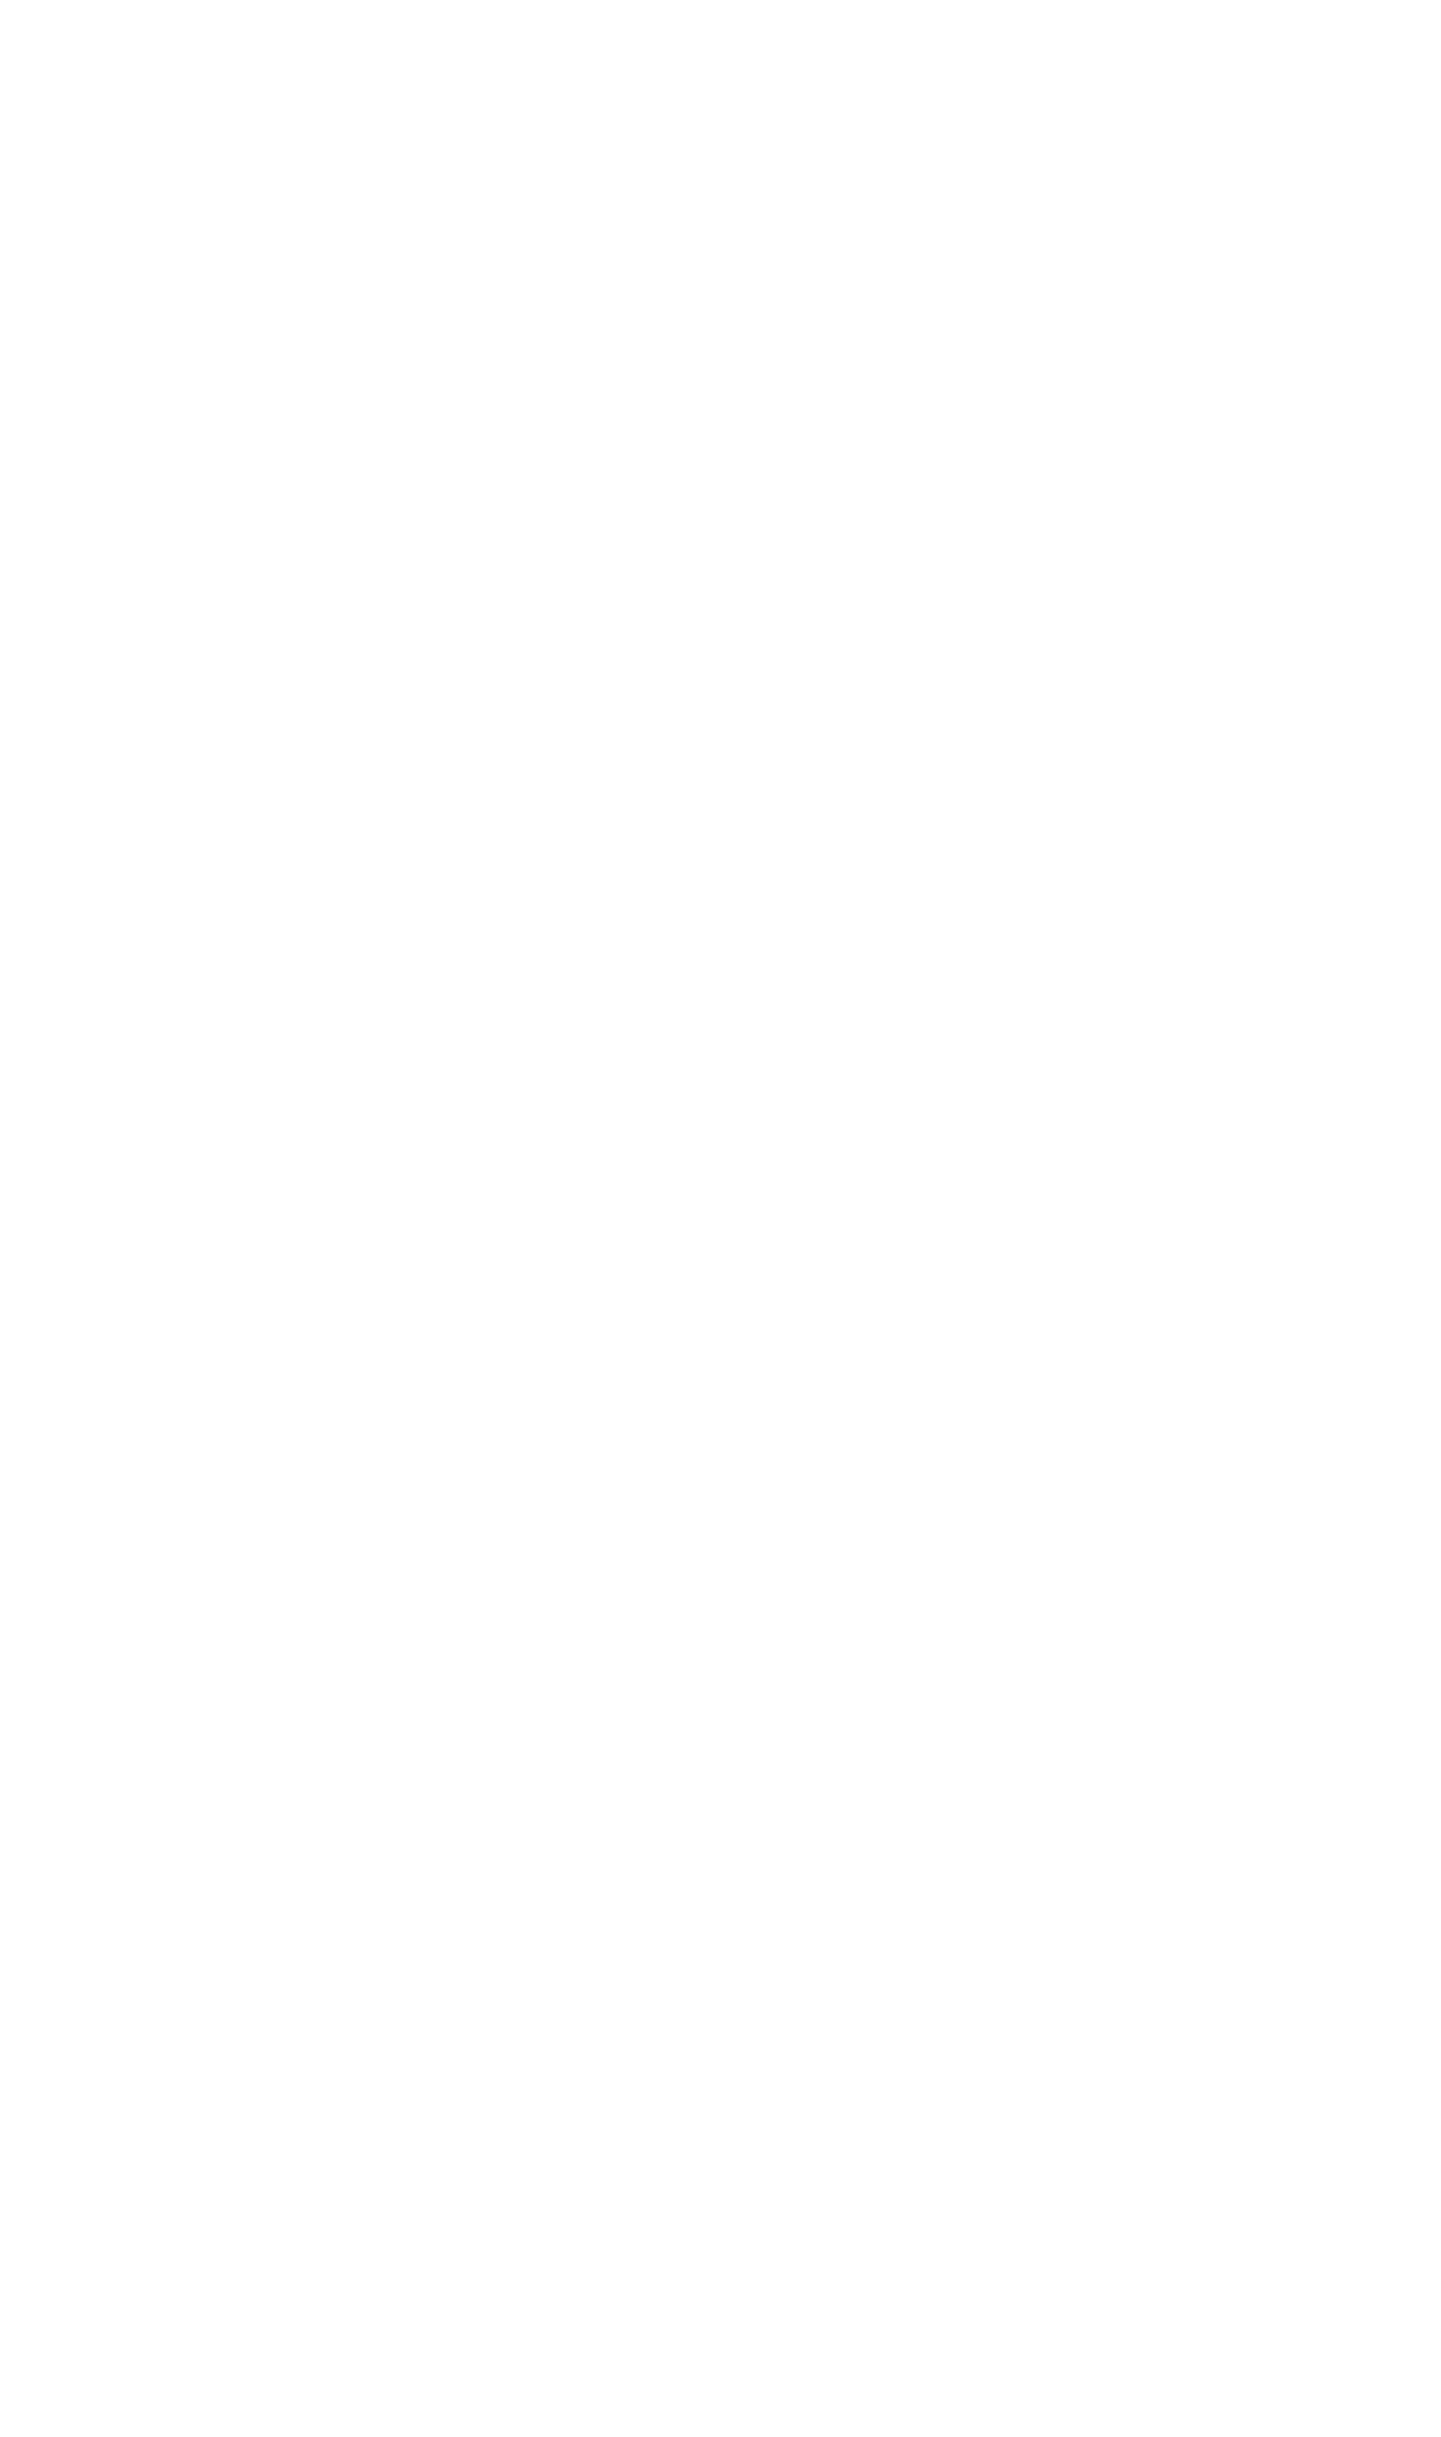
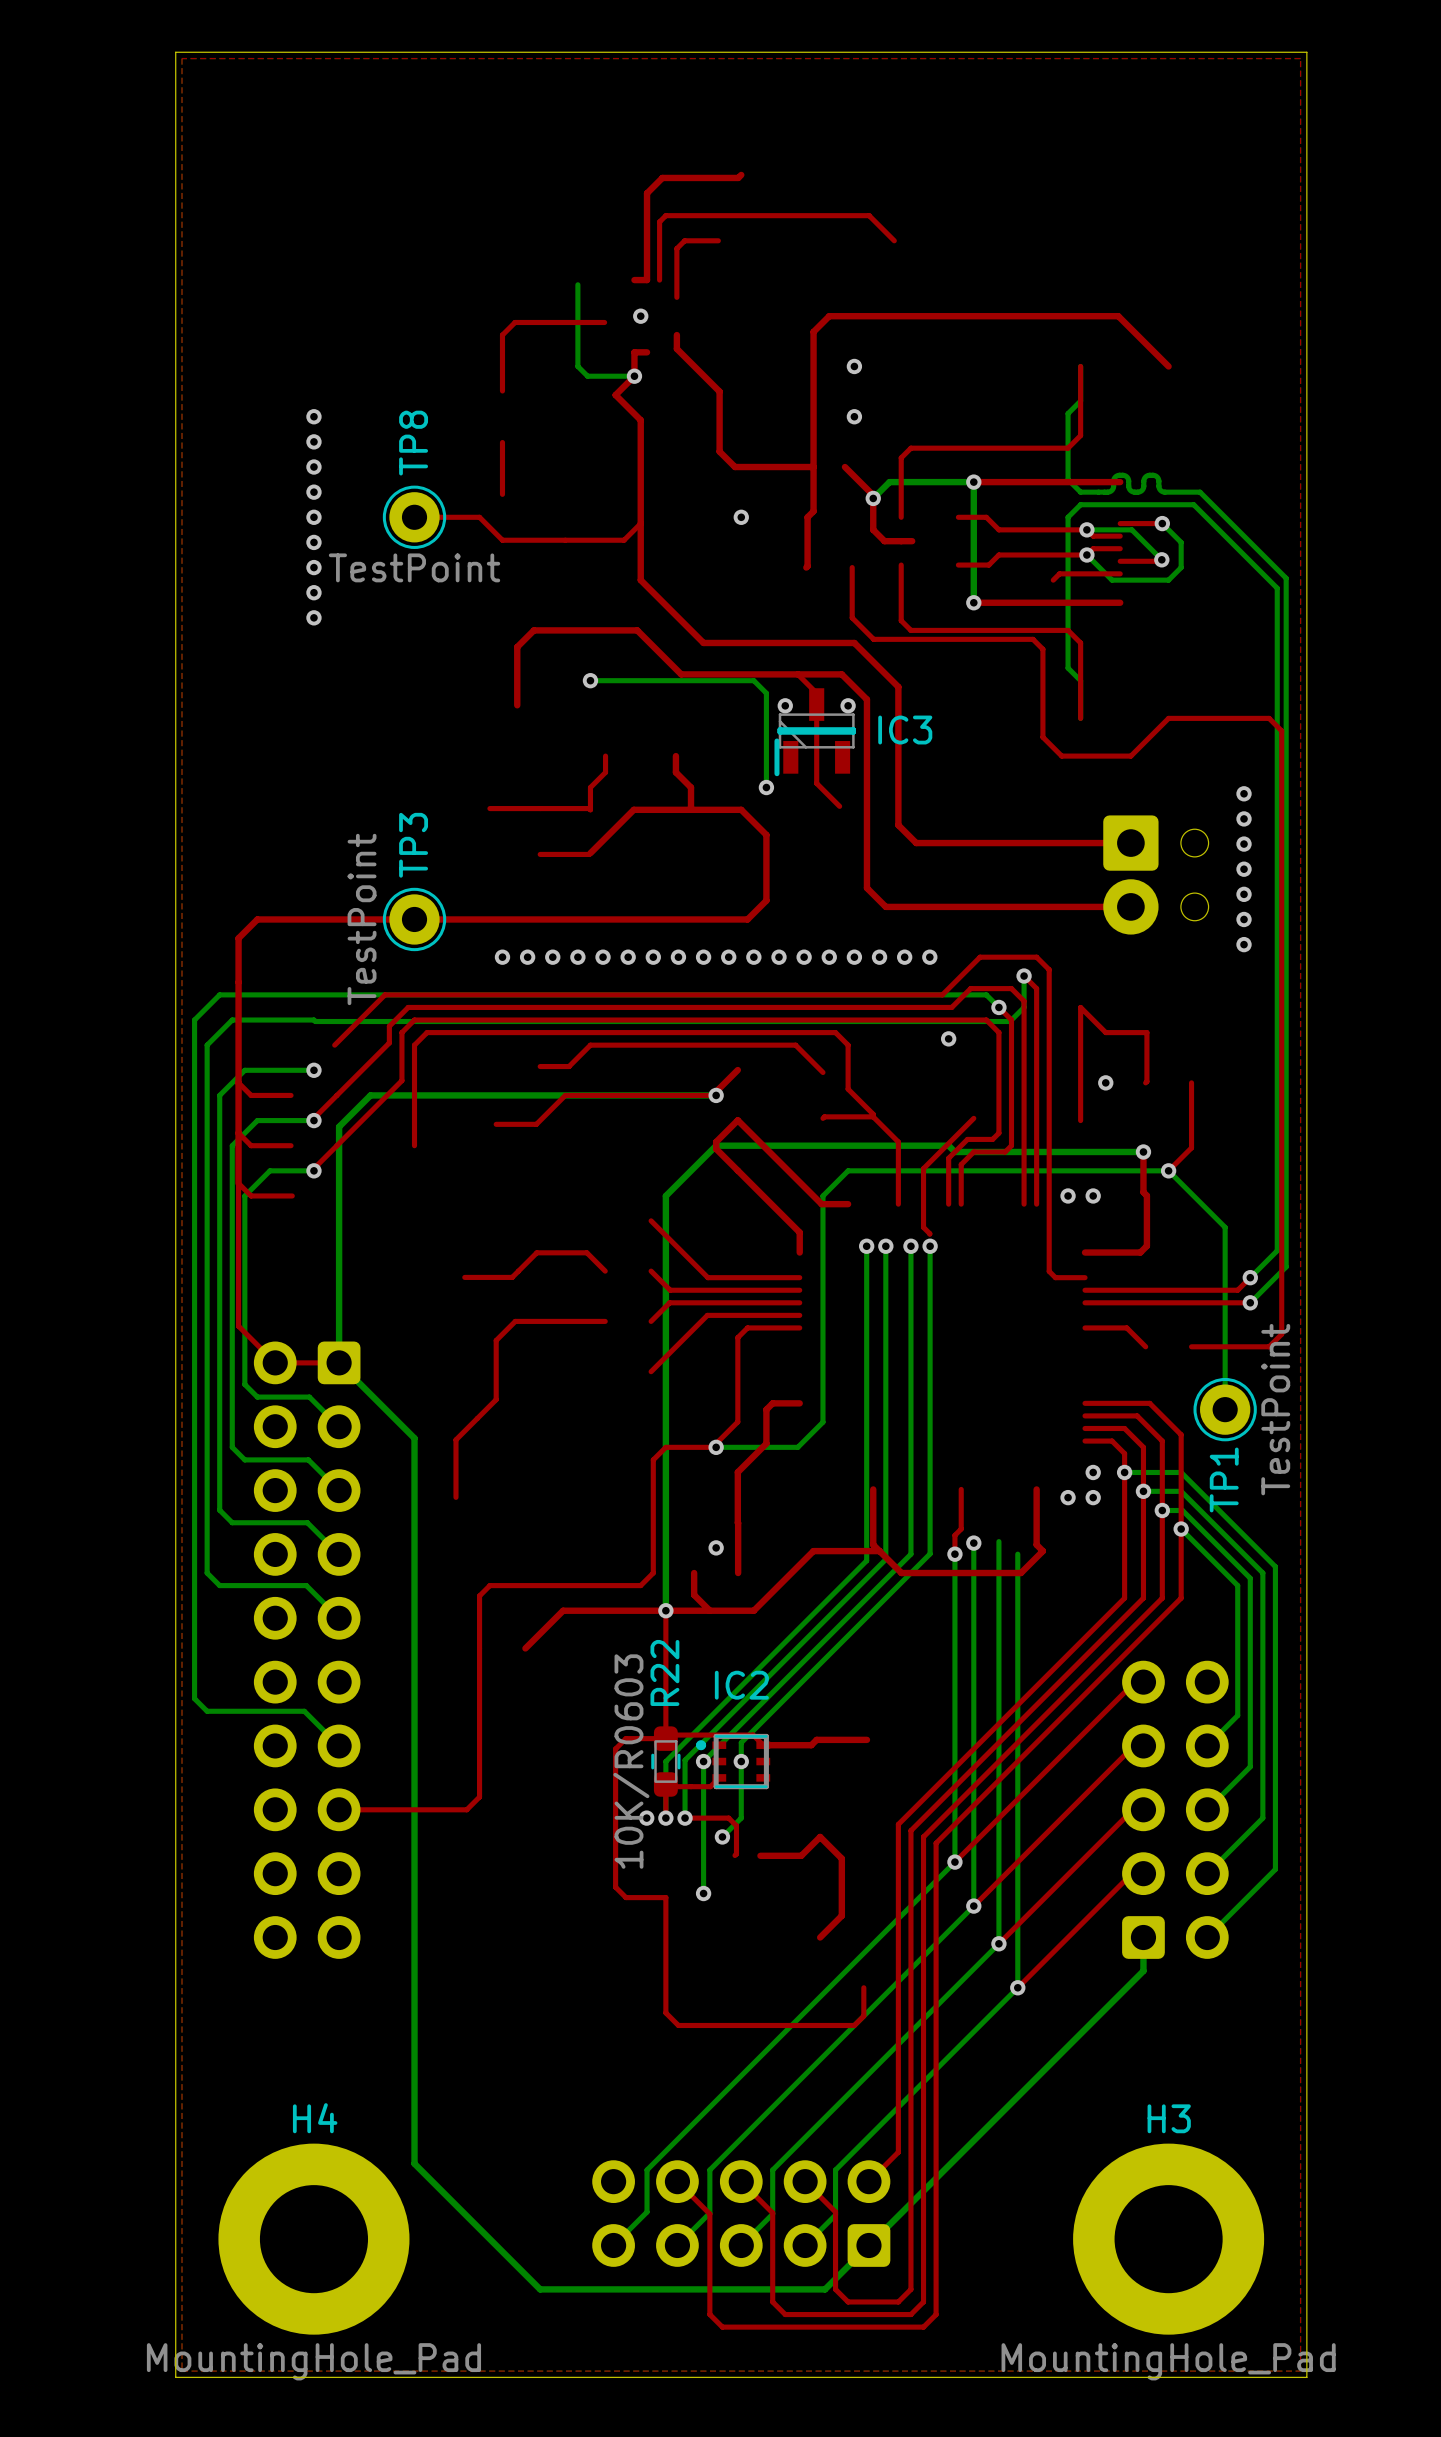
board edge: none -> (175, 52) (1306, 52) (1306, 2377) (175, 2377) (175, 52)
top zone outline: none -> (182, 58) (182, 2371) (1300, 2371) (1300, 58) (182, 58)
top track: none -> (741, 174) (738, 177) (662, 177) (647, 193) (647, 280) (634, 280)
top track: none -> (718, 240) (684, 240) (676, 248) (676, 297)
top track: none -> (894, 240) (869, 215) (665, 215) (659, 221) (659, 280)
bottom track: none -> (577, 284) (577, 366) (587, 376) (634, 376)
via: none -> (640, 316)
top track: none -> (604, 322) (515, 322) (502, 335) (502, 390)
top track: none -> (676, 335) (676, 348) (719, 391) (719, 451) (735, 467) (813, 467)
top track: none -> (647, 352) (634, 352) (634, 376) (615, 395) (640, 420) (640, 580) (703, 642) (854, 642) (898, 686) (898, 825) (916, 843) (1130, 843)
via: none -> (854, 366)
top track: none -> (1080, 366) (1080, 435) (1068, 448) (910, 448) (901, 457) (901, 517)
bottom track: none -> (1080, 366) (1080, 401) (1068, 413) (1068, 479) (1080, 492) (1108, 492) (1113, 488) (1115, 477) (1124, 475) (1128, 478) (1130, 489) (1137, 492) (1143, 488) (1145, 477) (1153, 475) (1157, 478) (1159, 488) (1162, 491) (1200, 492) (1286, 578) (1286, 1266) (1250, 1302)
top track: none -> (1168, 366) (1118, 316) (829, 316) (813, 331) (813, 511) (807, 517) (806, 567)
via: none -> (634, 376)
via: none -> (313, 416)
via: none -> (854, 416)
via: none -> (313, 441)
top track: none -> (502, 442) (502, 494)
via: none -> (313, 467)
top track: none -> (844, 467) (873, 495) (873, 529) (884, 541) (912, 541)
top track: none -> (973, 482) (1120, 482)
via: none -> (973, 482)
via: none -> (313, 492)
bottom track: none -> (873, 498) (889, 482) (973, 482) (973, 602)
via: none -> (873, 498)
via: none -> (313, 517)
top track: none -> (414, 517) (479, 517) (502, 540) (624, 540) (640, 523)
TP8: none -> TestPoint (414, 517)
via: none -> (741, 517)
top track: none -> (958, 517) (986, 517) (998, 529) (1086, 529) (1093, 536) (1120, 536)
top track: none -> (1120, 523) (1162, 523)
bottom track: none -> (1162, 523) (1181, 542) (1181, 567) (1168, 580) (1112, 580) (1086, 555)
via: none -> (1162, 523)
bottom track: none -> (1086, 529) (1131, 529) (1161, 559)
via: none -> (1086, 529)
via: none -> (313, 542)
top track: none -> (1120, 548) (1093, 548) (1086, 555) (998, 555) (988, 565) (958, 565)
via: none -> (1086, 555)
top track: none -> (1161, 559) (1120, 561)
via: none -> (1161, 559)
top track: none -> (901, 565) (901, 620) (910, 630) (1068, 630) (1080, 642) (1080, 718)
via: none -> (313, 567)
top track: none -> (852, 567) (852, 617) (873, 639) (1033, 639) (1042, 649) (1042, 737) (1061, 756) (1130, 756) (1168, 718) (1269, 718) (1281, 730) (1281, 1334) (1269, 1346) (1191, 1346)
top track: none -> (1120, 573) (1059, 573) (1053, 580)
via: none -> (313, 592)
top track: none -> (973, 602) (1120, 602)
via: none -> (973, 602)
via: none -> (313, 617)
top track: none -> (797, 674) (816, 693) (816, 783) (839, 806)
bottom track: none -> (590, 680) (753, 680) (766, 693) (766, 787)
via: none -> (590, 680)
top track: none -> (517, 705) (517, 647) (533, 630) (637, 630) (681, 674) (841, 674) (866, 699) (866, 888) (885, 906) (1130, 906)
via: none -> (785, 705)
via: none -> (848, 705)
bottom track: none -> (1080, 718) (1080, 680) (1068, 668) (1068, 517) (1080, 504) (1193, 504) (1277, 588) (1277, 1250) (1250, 1277)
IC3: none -> (815, 732)
top track: none -> (605, 756) (605, 772) (590, 787) (590, 809) (489, 808)
top track: none -> (675, 756) (675, 772) (691, 787) (691, 809)
via: none -> (766, 787)
via: none -> (1244, 793)
via: none -> (1244, 818)
via: none -> (1244, 844)
top track: none -> (540, 854) (589, 854) (633, 809) (741, 809) (766, 834) (766, 900) (747, 919) (257, 919) (238, 938) (238, 1183)
via: none -> (1244, 869)
part: none -> (1155, 874)
via: none -> (1244, 894)
TP3: none -> TestPoint (414, 919)
via: none -> (1244, 919)
via: none -> (1244, 944)
via: none -> (502, 957)
via: none -> (527, 957)
via: none -> (552, 957)
via: none -> (577, 957)
via: none -> (603, 957)
via: none -> (628, 957)
via: none -> (653, 957)
via: none -> (678, 957)
via: none -> (703, 957)
via: none -> (728, 957)
via: none -> (753, 957)
via: none -> (778, 957)
via: none -> (804, 957)
via: none -> (829, 957)
via: none -> (854, 957)
via: none -> (879, 957)
via: none -> (904, 957)
via: none -> (929, 957)
top track: none -> (1024, 976) (1036, 988) (1036, 1204)
bottom track: none -> (1024, 976) (1024, 1007) (1010, 1021) (232, 1020) (207, 1045) (207, 1573) (219, 1585) (306, 1585) (339, 1618)
via: none -> (1024, 976)
top track: none -> (998, 1007) (1011, 1020) (1011, 1145) (1005, 1151) (973, 1151) (961, 1164) (961, 1204)
bottom track: none -> (998, 1007) (986, 994) (219, 994) (194, 1020) (194, 1698) (207, 1711) (304, 1711) (339, 1745)
via: none -> (998, 1007)
via: none -> (948, 1038)
top track: none -> (334, 1045) (384, 994) (942, 994) (980, 957) (1036, 957) (1049, 969) (1049, 1271) (1055, 1277) (1085, 1277)
top track: none -> (540, 1066) (569, 1066) (590, 1045) (795, 1045) (822, 1072)
bottom track: none -> (313, 1070) (244, 1070) (219, 1095) (219, 1510) (232, 1522) (307, 1522) (339, 1554)
via: none -> (313, 1070)
top track: none -> (737, 1070) (716, 1091) (716, 1095) (565, 1095) (536, 1124) (496, 1124)
top track: none -> (238, 1082) (251, 1095) (291, 1095)
via: none -> (1105, 1082)
top track: none -> (1145, 1082) (1146, 1032) (1105, 1032) (1080, 1007) (1080, 1120)
top track: none -> (1191, 1082) (1191, 1147) (1168, 1170)
bottom track: none -> (716, 1095) (370, 1095) (339, 1126) (339, 1362) (414, 1438) (414, 2163) (540, 2289) (825, 2289) (1143, 1971) (1143, 1937)
via: none -> (716, 1095)
top track: none -> (873, 1116) (873, 1114) (848, 1089) (848, 1045) (835, 1032) (427, 1032) (414, 1045) (414, 1145)
top track: none -> (873, 1116) (898, 1142) (898, 1204)
top track: none -> (873, 1116) (822, 1118)
top track: none -> (973, 1118) (923, 1168) (923, 1227) (929, 1234)
top track: none -> (313, 1120) (313, 1118) (389, 1042) (389, 1026) (408, 1007) (951, 1007) (970, 988) (1011, 988) (1024, 1001) (1024, 1204)
bottom track: none -> (313, 1120) (257, 1120) (232, 1145) (232, 1447) (244, 1459) (308, 1459) (339, 1490)
via: none -> (313, 1120)
top track: none -> (238, 1133) (251, 1145) (291, 1145)
top track: none -> (1143, 1151) (1143, 1192) (1146, 1195) (1146, 1246) (1140, 1252) (1085, 1252)
bottom track: none -> (1143, 1151) (954, 1151) (948, 1145) (716, 1145) (665, 1195) (665, 1610)
via: none -> (1143, 1151)
top track: none -> (313, 1170) (313, 1168) (401, 1080) (401, 1032) (414, 1020) (986, 1020) (998, 1032) (998, 1133) (992, 1139) (967, 1139) (948, 1158) (948, 1204)
bottom track: none -> (313, 1170) (269, 1170) (244, 1195) (244, 1384) (257, 1397) (309, 1397) (339, 1426)
via: none -> (313, 1170)
via: none -> (1168, 1170)
top track: none -> (238, 1183) (251, 1195) (292, 1195)
top track: none -> (238, 1183) (238, 1326) (275, 1362) (339, 1362)
via: none -> (1068, 1195)
via: none -> (1093, 1195)
top track: none -> (848, 1204) (821, 1204) (737, 1120) (716, 1142) (716, 1148) (799, 1232) (799, 1252)
top track: none -> (651, 1220) (707, 1277) (799, 1277)
bottom track: none -> (866, 1246) (866, 1560) (665, 1761) (665, 1818)
via: none -> (866, 1246)
bottom track: none -> (885, 1246) (885, 1559) (685, 1760) (685, 1818)
via: none -> (885, 1246)
bottom track: none -> (910, 1246) (910, 1554) (703, 1761) (703, 1893)
via: none -> (910, 1246)
bottom track: none -> (930, 1246) (930, 1553) (741, 1742) (741, 1818) (722, 1836)
via: none -> (930, 1246)
top track: none -> (605, 1271) (586, 1252) (536, 1252) (512, 1277) (464, 1277)
top track: none -> (651, 1271) (670, 1290) (799, 1290)
top track: none -> (1250, 1277) (1237, 1290) (1085, 1290)
via: none -> (1250, 1277)
top track: none -> (799, 1302) (669, 1302) (651, 1321)
top track: none -> (1085, 1302) (1250, 1302)
via: none -> (1250, 1302)
top track: none -> (799, 1315) (707, 1315) (651, 1371)
top track: none -> (605, 1321) (515, 1321) (496, 1340) (496, 1399) (455, 1439) (455, 1497)
top track: none -> (799, 1327) (747, 1327) (737, 1337) (737, 1421) (716, 1443) (716, 1447) (665, 1447) (653, 1459) (653, 1573) (640, 1585) (489, 1585) (479, 1595) (479, 1797) (466, 1809) (339, 1809)
top track: none -> (1085, 1327) (1126, 1327) (1145, 1346)
top track: none -> (799, 1403) (772, 1403) (766, 1409) (766, 1443) (737, 1472) (737, 1522)
top track: none -> (1085, 1403) (1149, 1403) (1181, 1434) (1181, 1598) (936, 1843) (936, 2314) (923, 2327) (722, 2327) (709, 2314) (709, 2214) (677, 2181)
bottom track: none -> (1225, 1409) (1225, 1227) (1168, 1170) (848, 1170) (822, 1195) (822, 1422) (797, 1447) (716, 1447)
TP1: none -> TestPoint (1225, 1409)
top track: none -> (1085, 1415) (1137, 1415) (1162, 1441) (1162, 1598) (923, 1836) (923, 2301) (910, 2314) (785, 2314) (772, 2301) (772, 2213) (741, 2181)
top track: none -> (1085, 1428) (1124, 1428) (1143, 1447) (1143, 1598) (910, 1830) (910, 2289) (898, 2301) (848, 2301) (835, 2289) (835, 2212) (805, 2181)
top track: none -> (1085, 1441) (1112, 1441) (1124, 1453) (1124, 1598) (898, 1824) (898, 2152) (868, 2181)
via: none -> (716, 1447)
via: none -> (1093, 1472)
bottom track: none -> (1124, 1472) (1181, 1472) (1275, 1566) (1275, 1869) (1207, 1937)
via: none -> (1124, 1472)
top track: none -> (873, 1489) (873, 1544) (901, 1573) (1020, 1573) (1042, 1551) (1036, 1544) (1036, 1489)
top track: none -> (961, 1489) (961, 1529) (954, 1535) (954, 1554)
bottom track: none -> (1143, 1491) (1181, 1491) (1262, 1573) (1262, 1818) (1207, 1873)
via: none -> (1143, 1491)
via: none -> (1068, 1497)
via: none -> (1093, 1497)
bottom track: none -> (1162, 1510) (1182, 1510) (1250, 1578) (1250, 1766) (1207, 1809)
via: none -> (1162, 1510)
top track: none -> (738, 1523) (738, 1573)
bottom track: none -> (1181, 1529) (1237, 1585) (1237, 1715) (1207, 1745)
via: none -> (1181, 1529)
bottom track: none -> (998, 1541) (998, 1943) (772, 2170) (772, 2214) (741, 2245)
bottom track: none -> (973, 1543) (973, 1906) (709, 2170) (709, 2213) (677, 2245)
via: none -> (973, 1543)
via: none -> (716, 1547)
top track: none -> (879, 1551) (813, 1551) (753, 1610) (563, 1610) (525, 1648)
bottom track: none -> (954, 1554) (954, 1862) (647, 2170) (647, 2212) (613, 2245)
via: none -> (954, 1554)
bottom track: none -> (1017, 1554) (1017, 1987) (835, 2170) (835, 2215) (805, 2245)
top track: none -> (694, 1573) (694, 1595) (709, 1610)
top track: none -> (665, 1610) (665, 1738)
via: none -> (665, 1610)
part: none -> (307, 1650)
top track: none -> (1143, 1682) (1134, 1682) (954, 1862)
top track: none -> (665, 1738) (625, 1738) (615, 1748) (615, 1887) (625, 1897) (665, 1897) (665, 2012) (678, 2025) (854, 2025) (863, 2016) (863, 1987)
top track: none -> (665, 1738) (669, 1735) (753, 1735) (763, 1745) (811, 1745) (816, 1739) (866, 1739)
top track: none -> (1143, 1745) (1133, 1745) (973, 1906)
R22: none -> 10K/R0603 (665, 1761)
via: none -> (703, 1761)
IC2: none -> (733, 1761)
via: none -> (741, 1761)
top track: none -> (719, 1777) (710, 1786) (668, 1786) (665, 1784) (665, 1818)
top track: none -> (1143, 1809) (1132, 1809) (998, 1943)
part: none -> (1175, 1809)
via: none -> (646, 1818)
via: none -> (665, 1818)
top track: none -> (685, 1818) (728, 1818) (736, 1825) (735, 1855)
via: none -> (685, 1818)
via: none -> (722, 1836)
top track: none -> (760, 1855) (801, 1855) (820, 1836) (841, 1858) (841, 1915) (820, 1937)
via: none -> (954, 1862)
top track: none -> (1143, 1873) (1131, 1873) (1017, 1987)
via: none -> (703, 1893)
via: none -> (973, 1906)
via: none -> (998, 1943)
via: none -> (1017, 1987)
part: none -> (741, 2213)
H4: none -> MountingHole_Pad (313, 2239)
H3: none -> MountingHole_Pad (1168, 2239)

